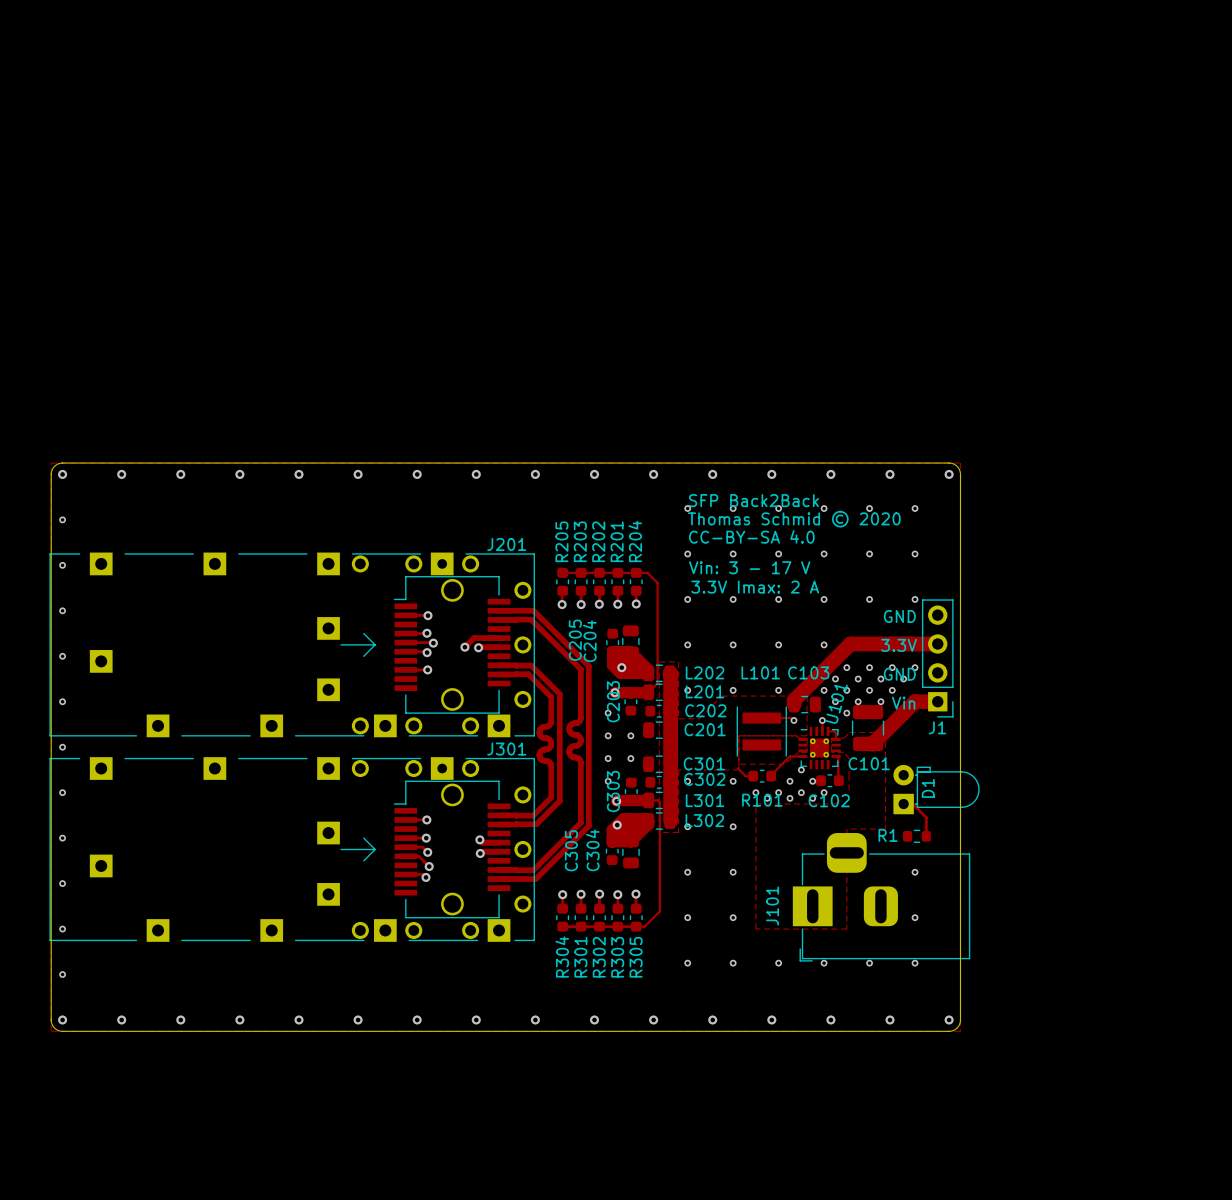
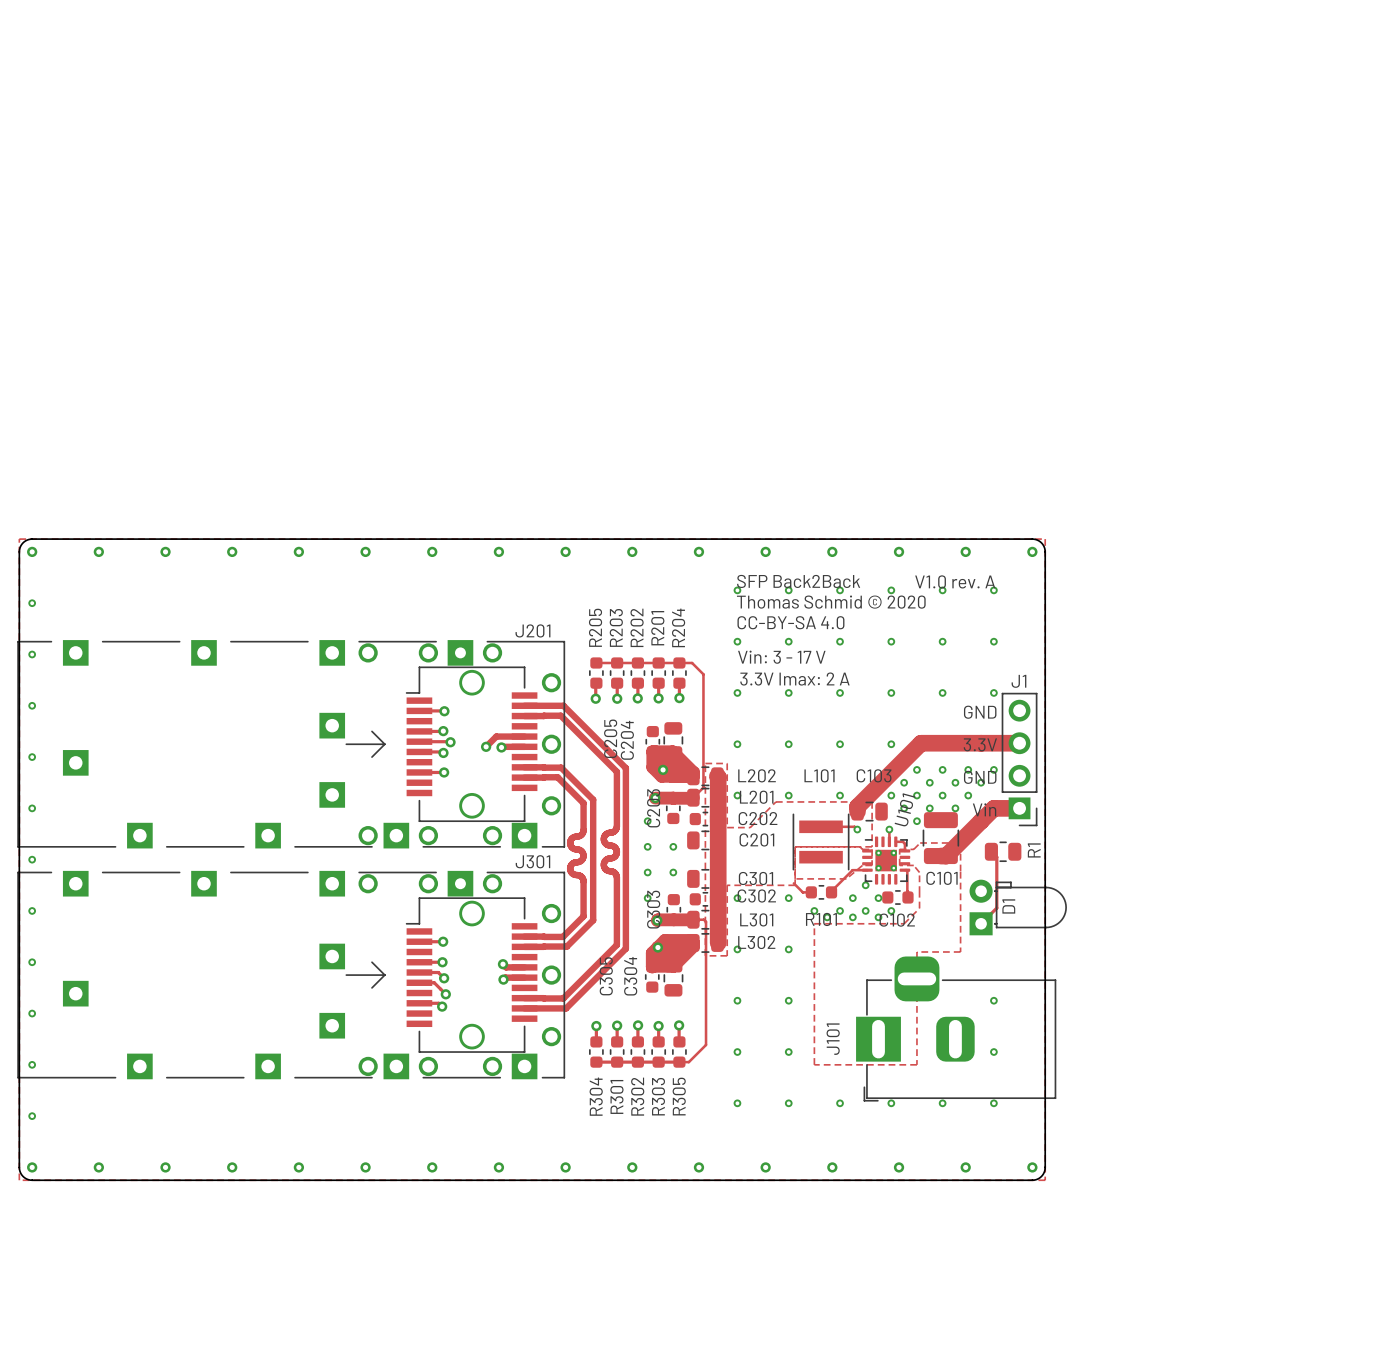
text: none -> V1.0 rev. A (955, 581)
J1 name position: J1 (937, 727) -> J1 (1018, 681)
track: (903, 804) (912, 804) (926, 817) (926, 836) -> (981, 923) (996, 908) (996, 857) (991, 851)
R1 footprint: [903, 829, 931, 843] -> [984, 841, 1022, 862]
R1 name position: R1 (888, 835) -> R1 (1034, 850)

